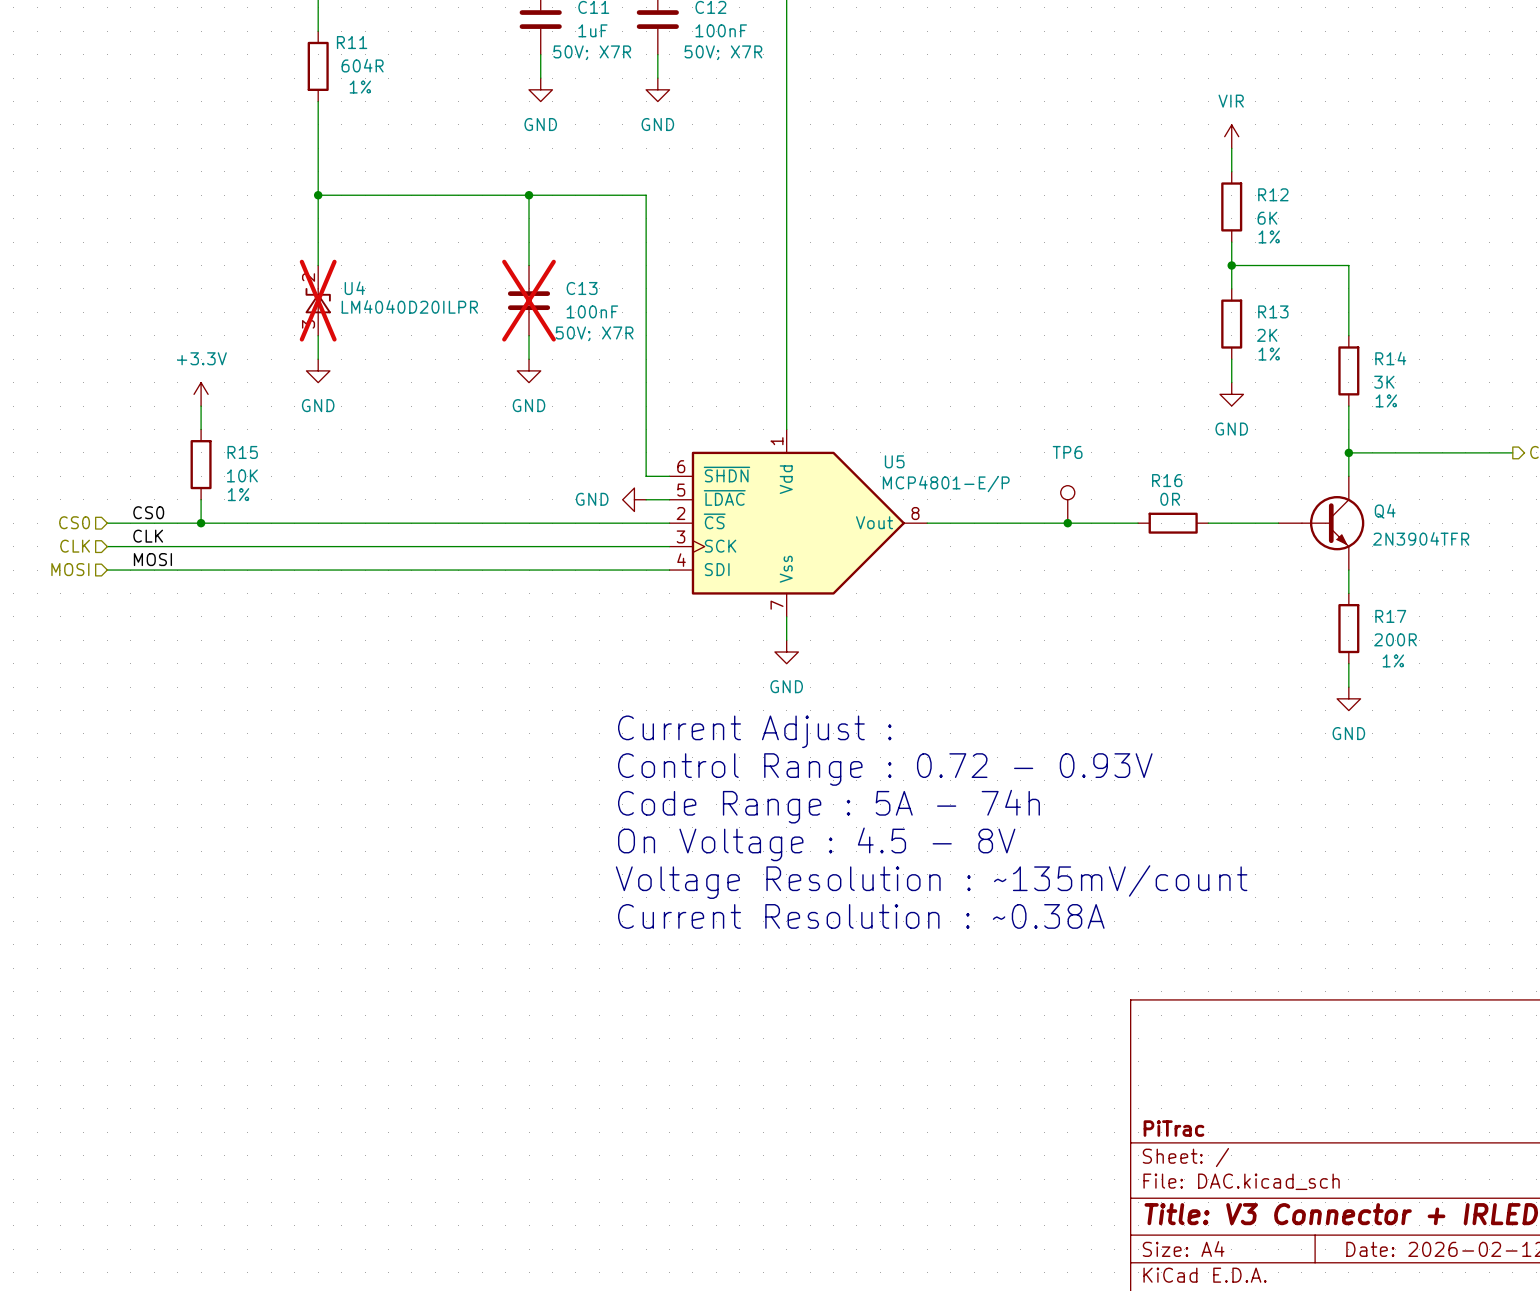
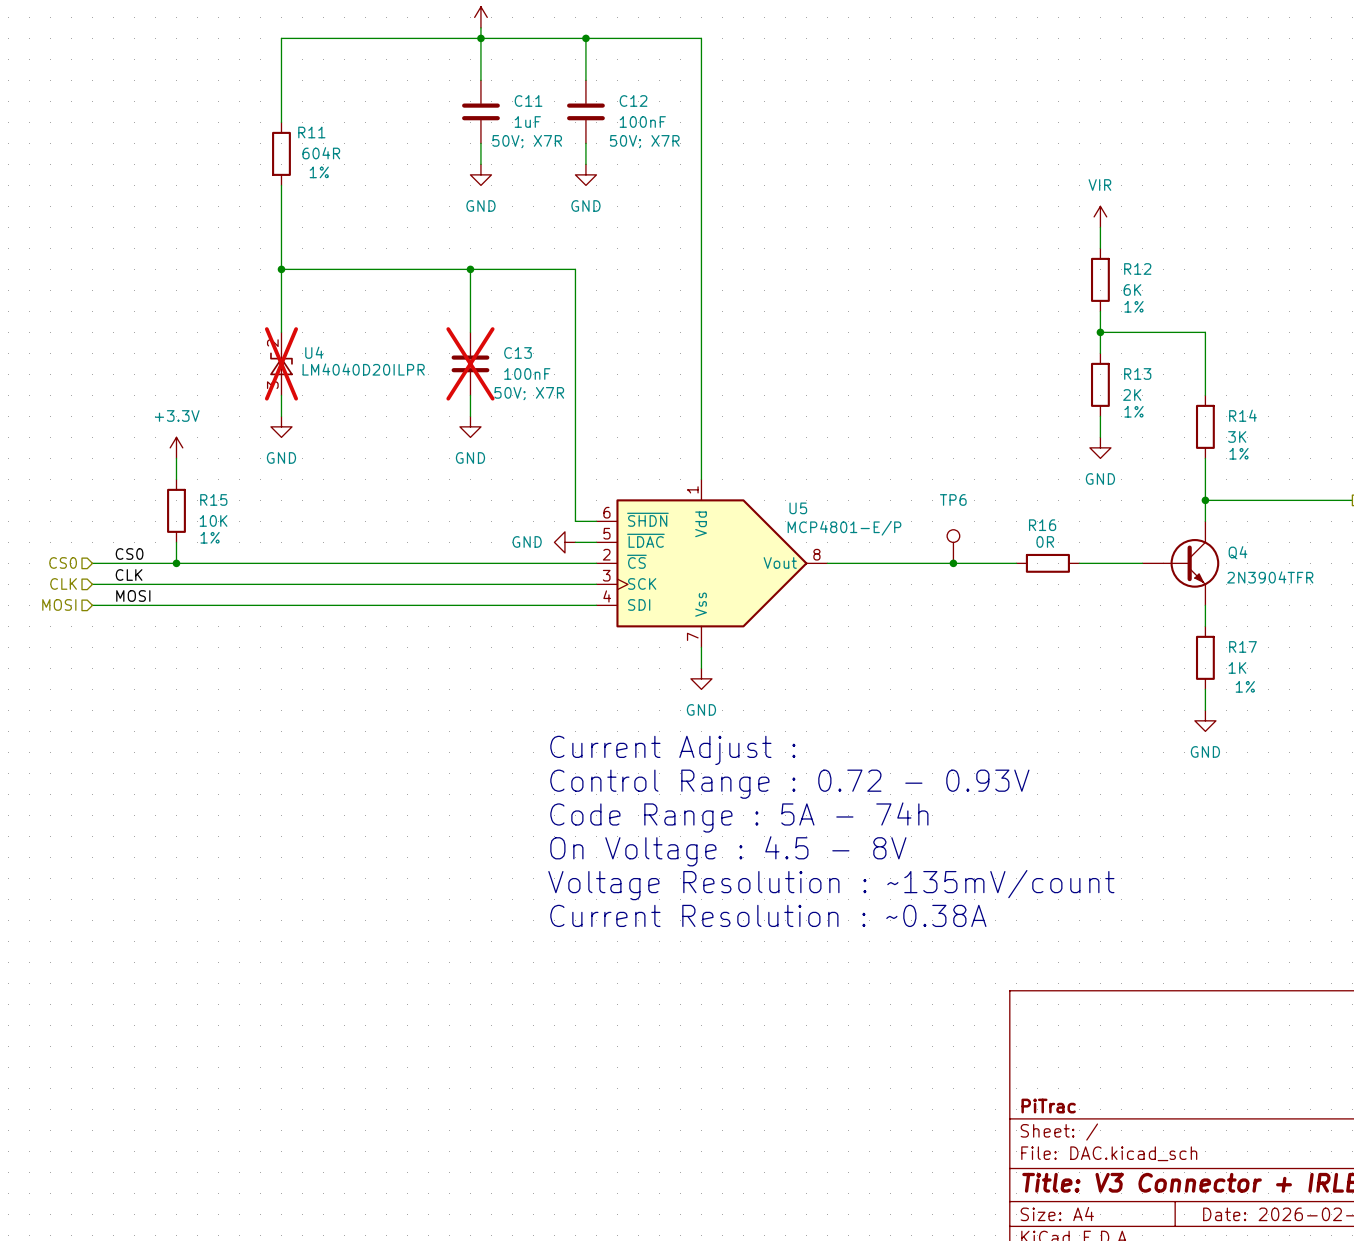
R17 value: 200R (1395, 639) -> 1K (1237, 667)

